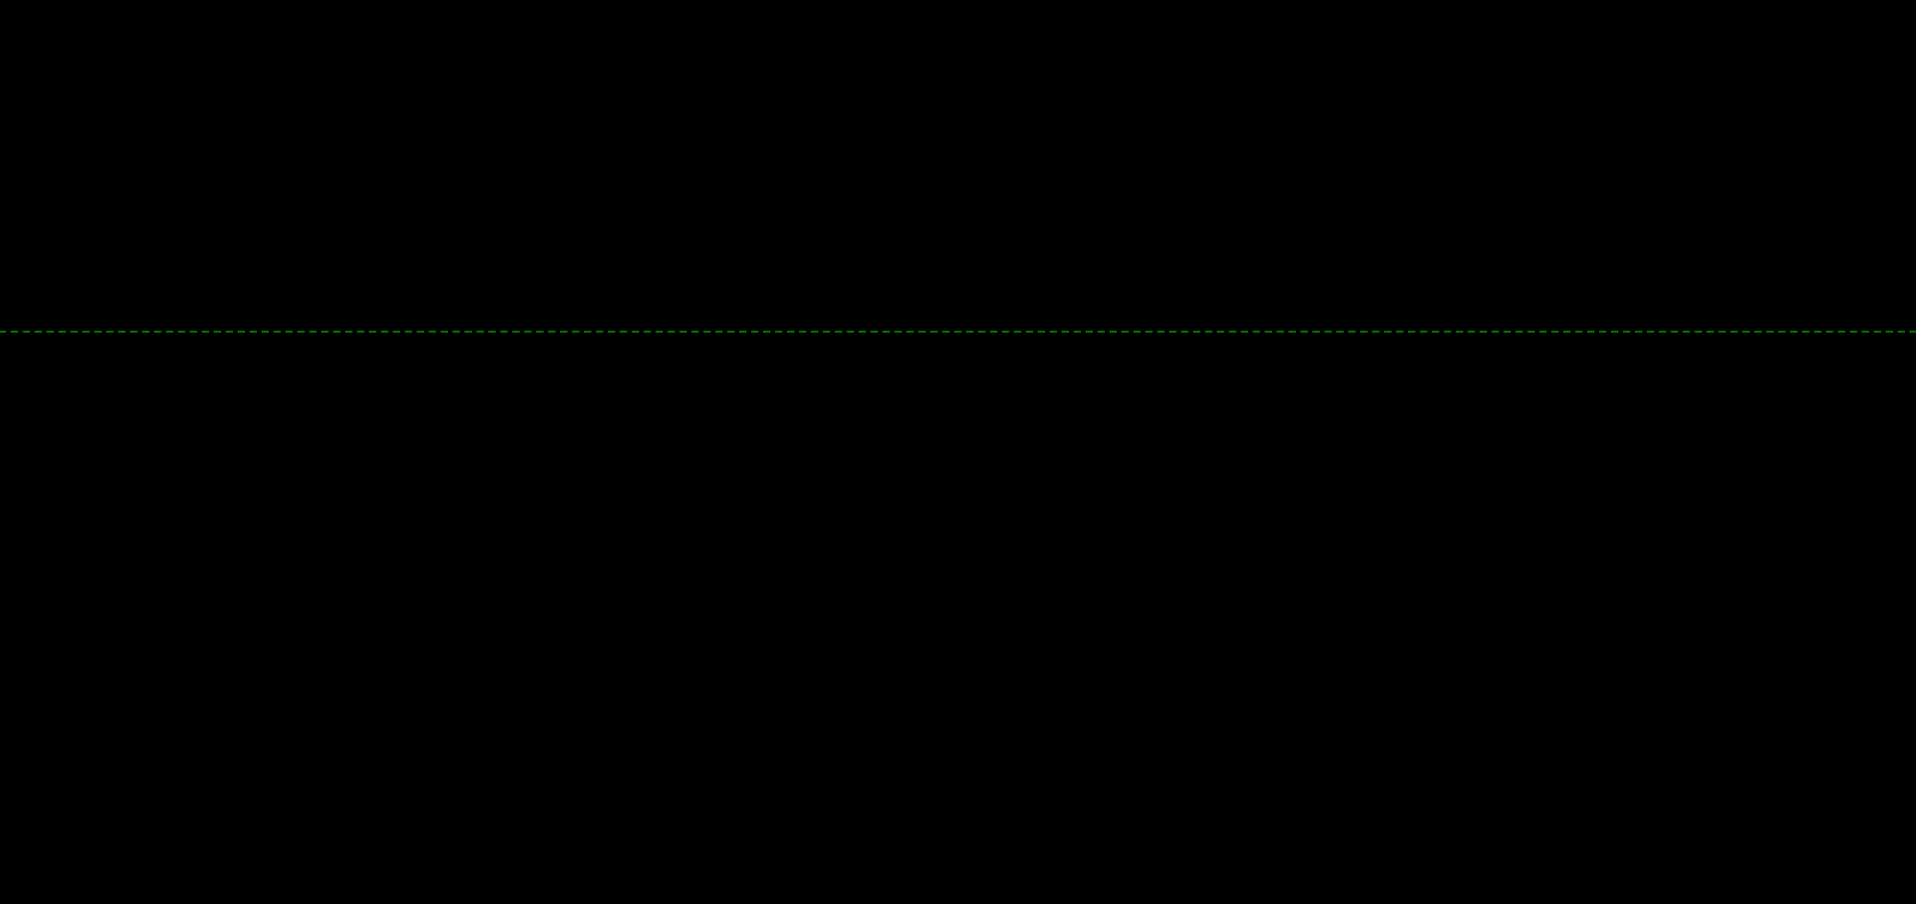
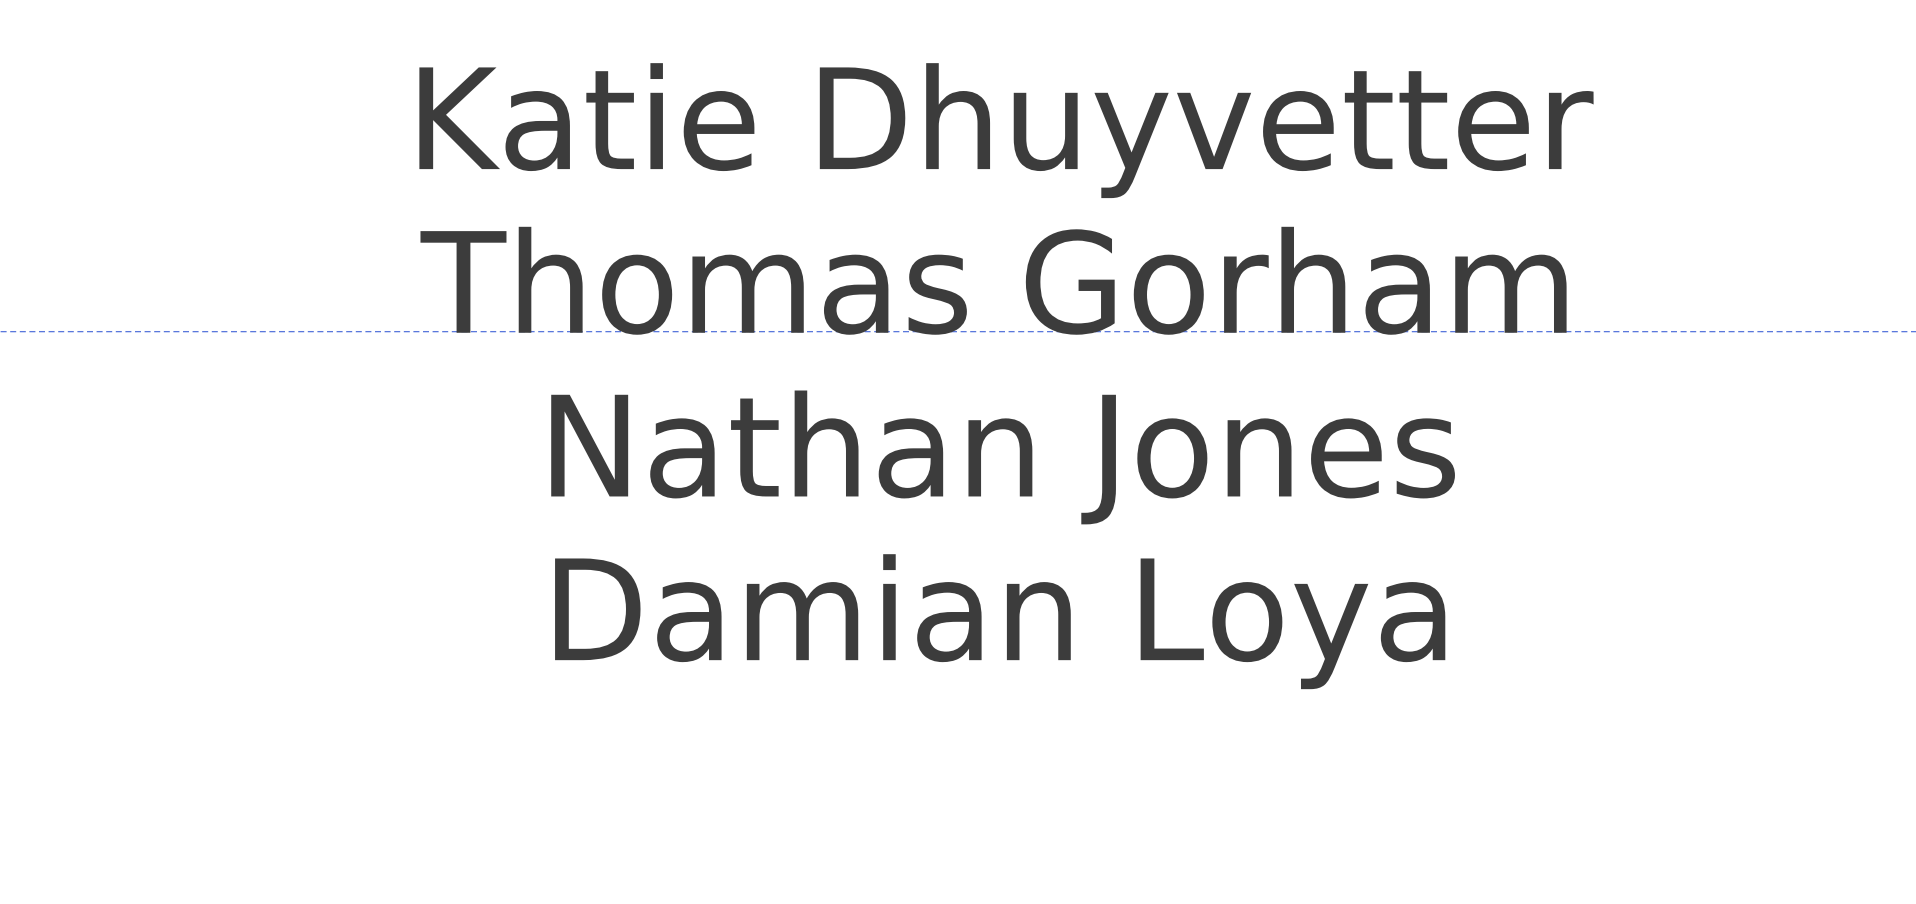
text: none -> Katie Dhuyvetter (1006, 130)
text: none -> Thomas Gorham (993, 280)
text: none -> Nathan Jones (1003, 457)
text: none -> Damian Loya (1000, 621)

